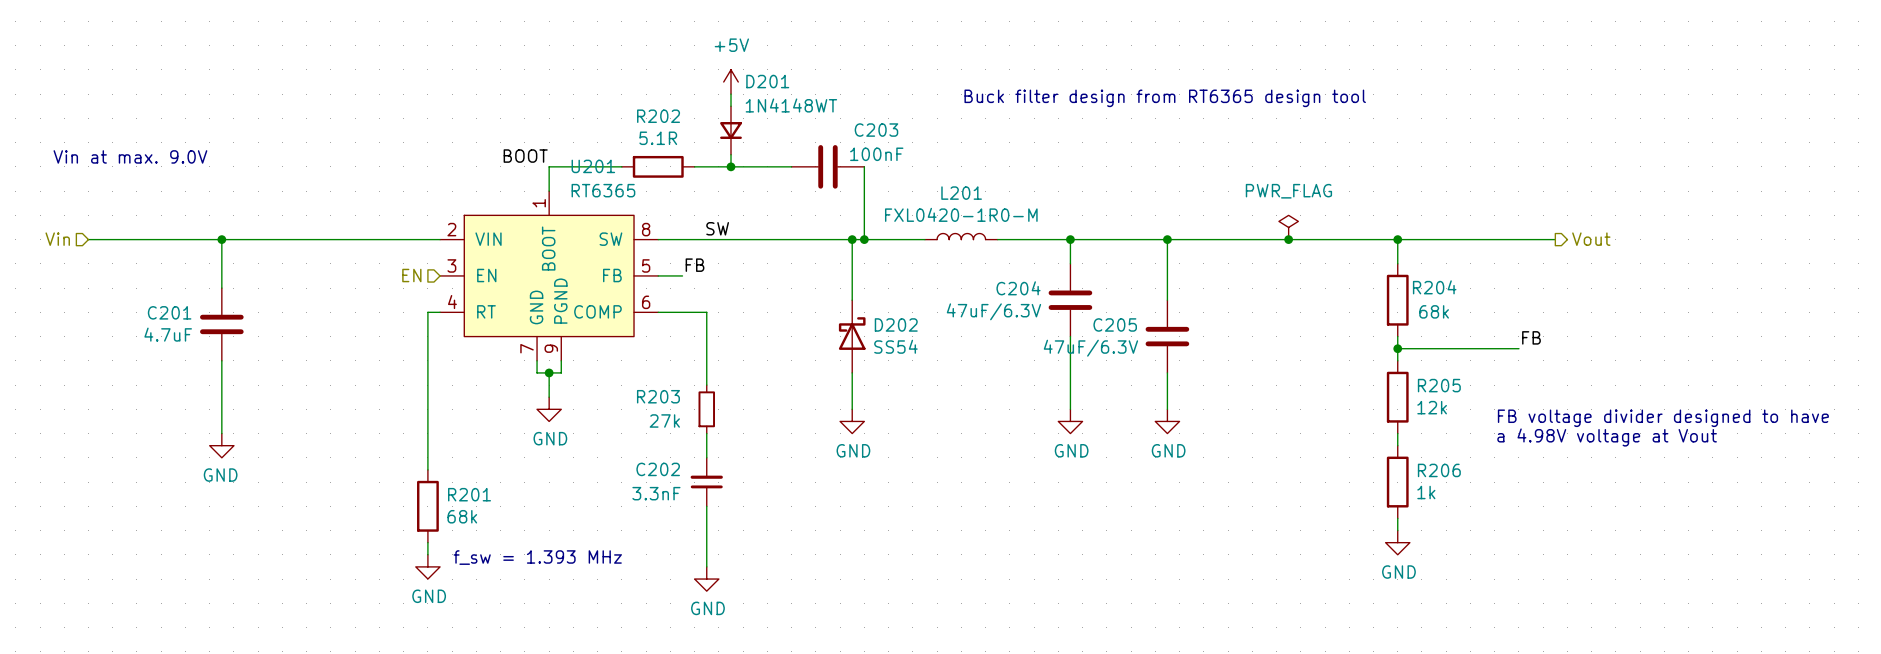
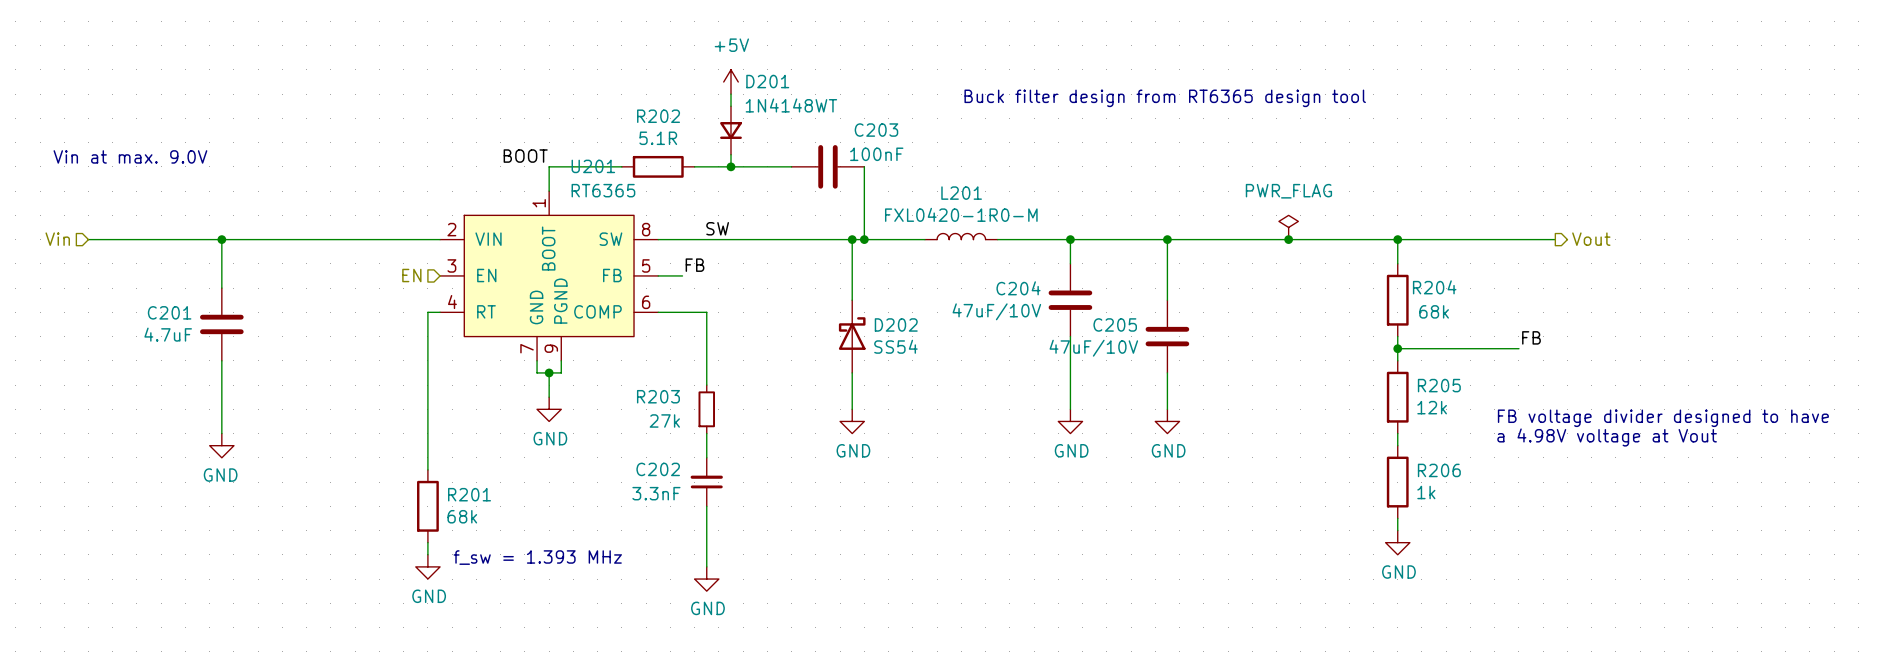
C204 value: 47uF/6.3V (993, 311) -> 47uF/10V (996, 311)
C205 value: 47uF/6.3V (1090, 348) -> 47uF/10V (1093, 348)

